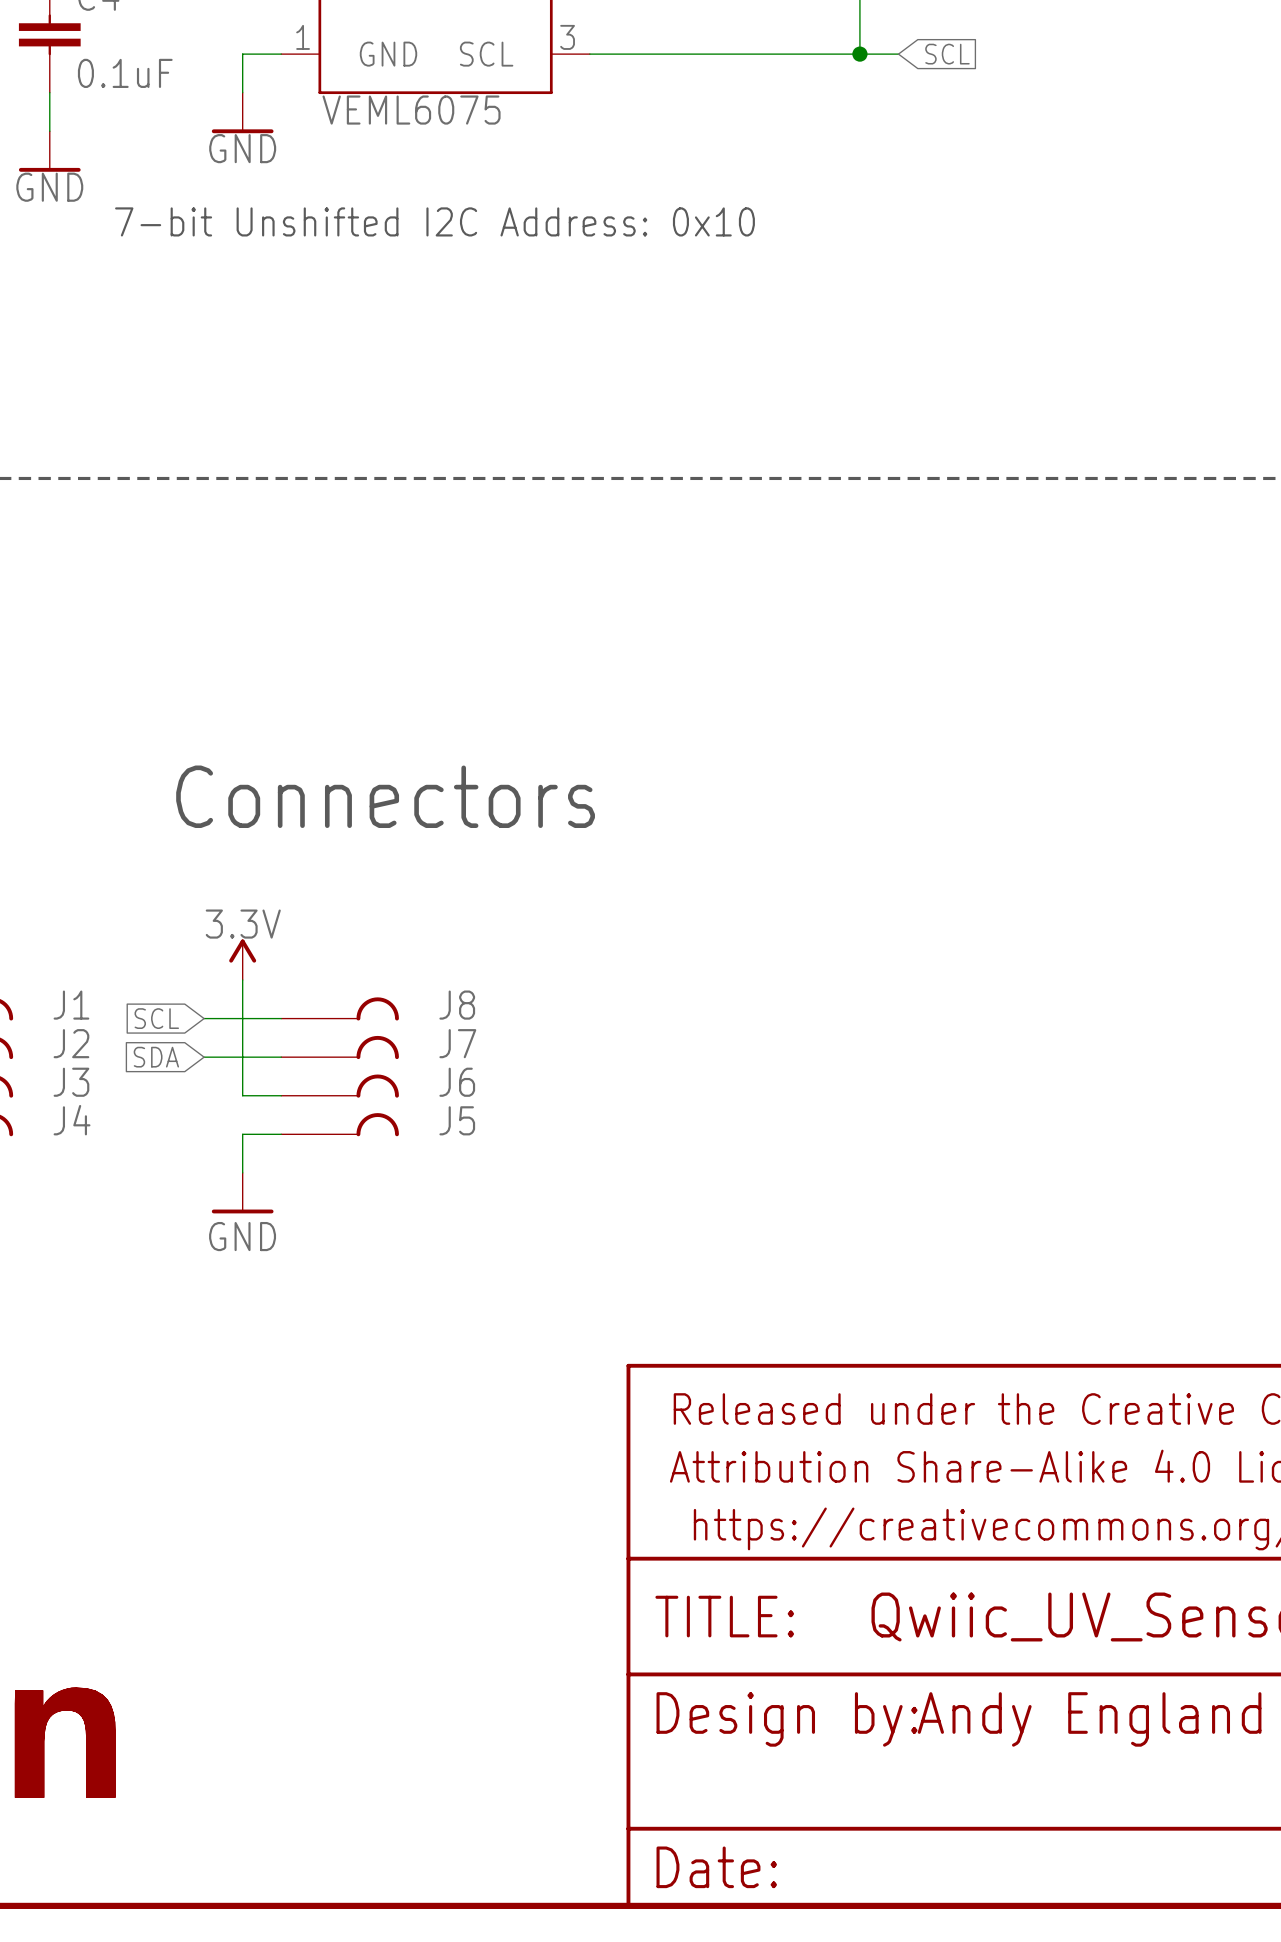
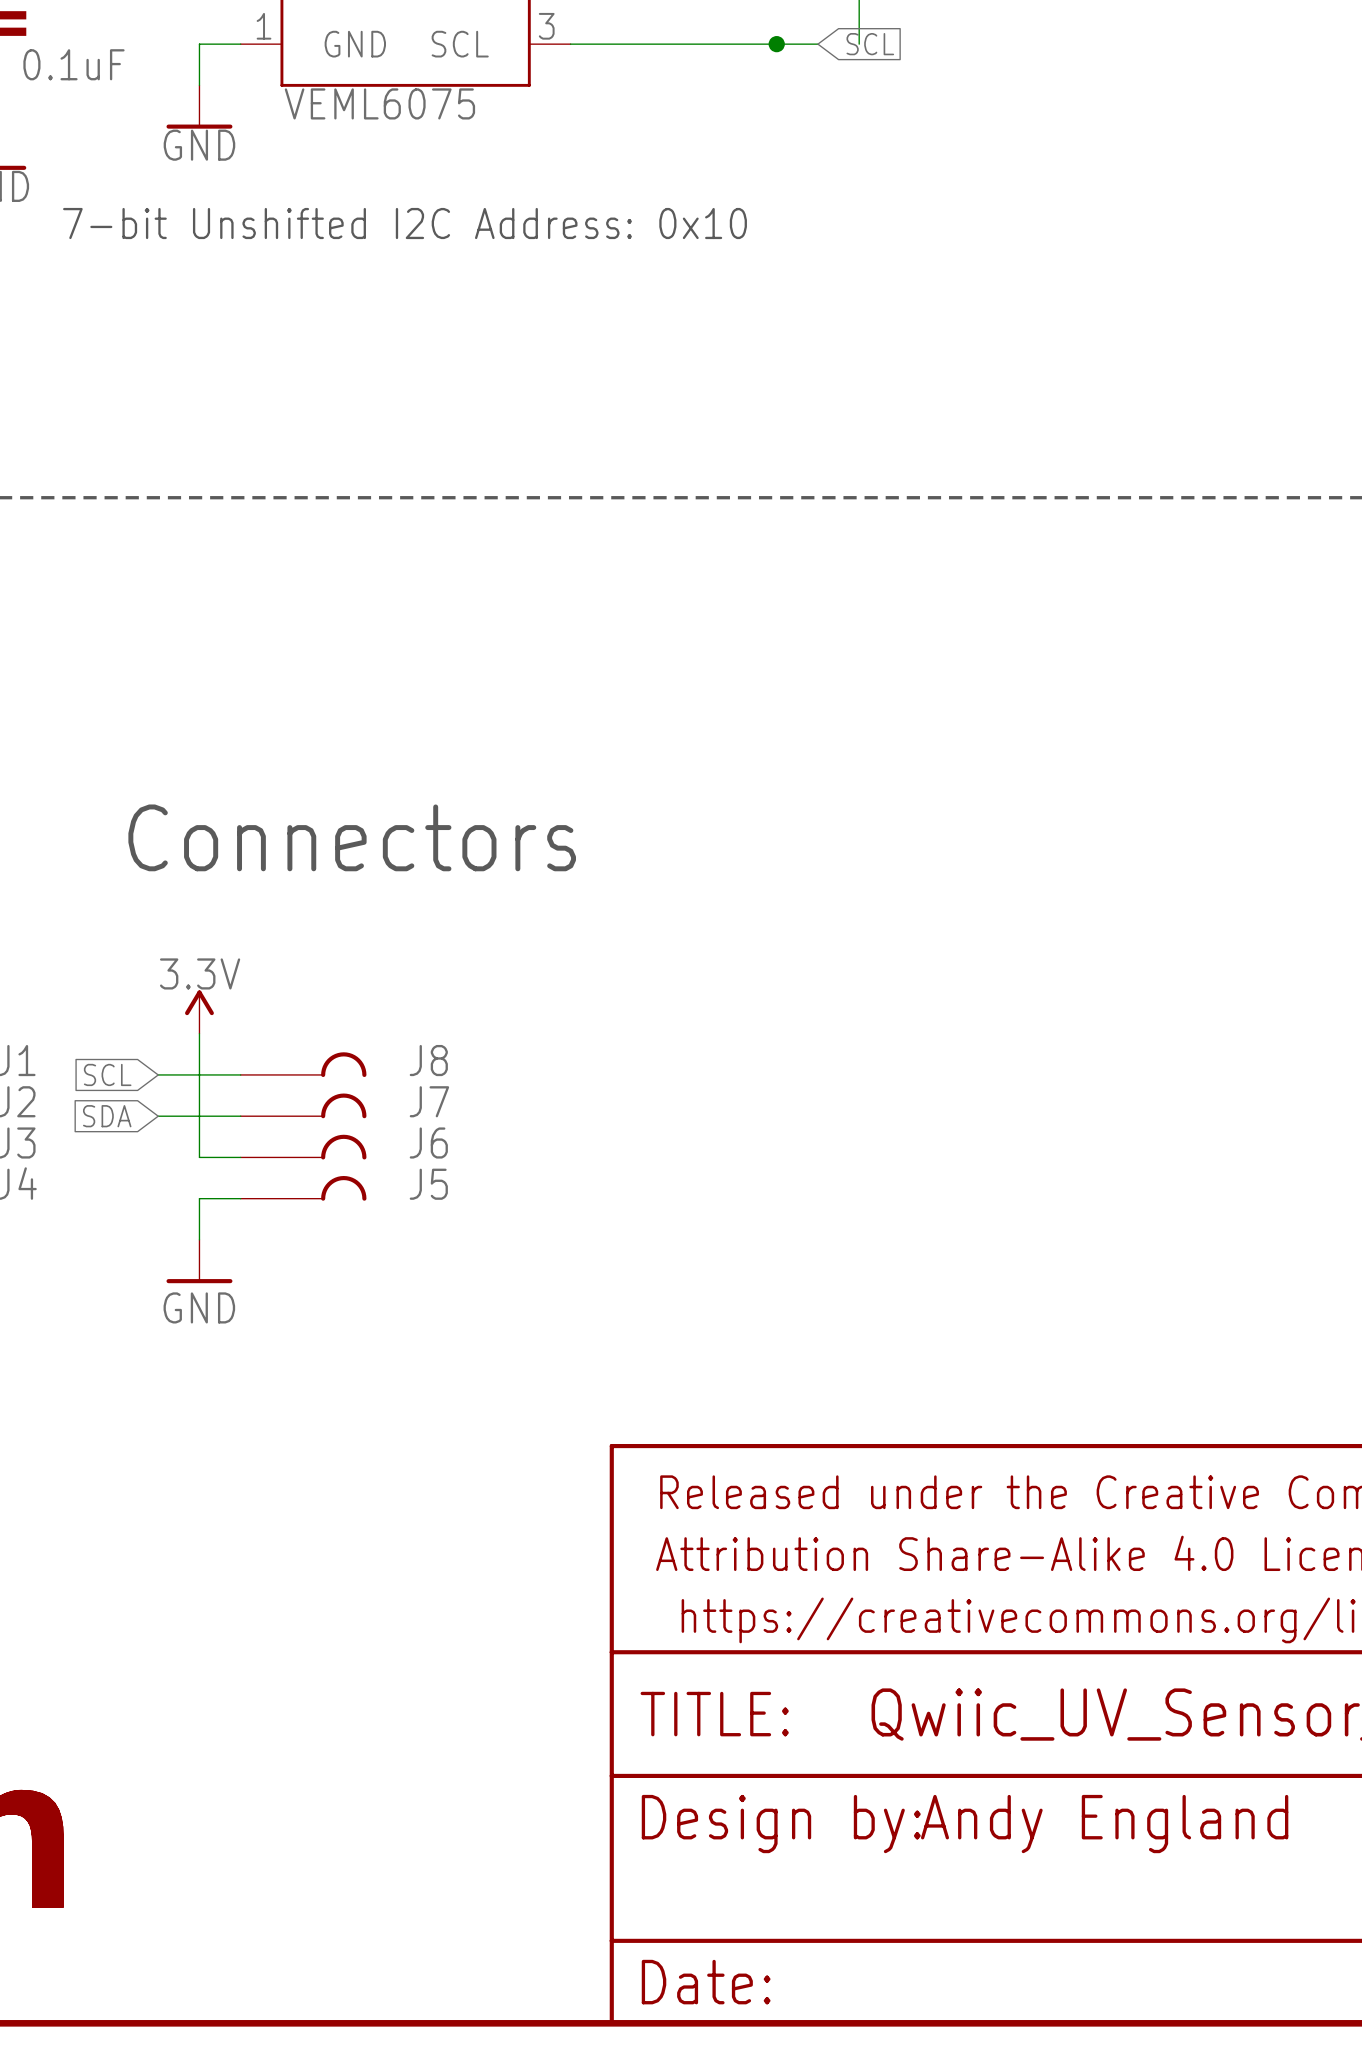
wire: (821, 54) (898, 54) -> none
junction position: (859, 54) -> (776, 44)
global label position: SCL (947, 54) -> SCL (870, 44)

